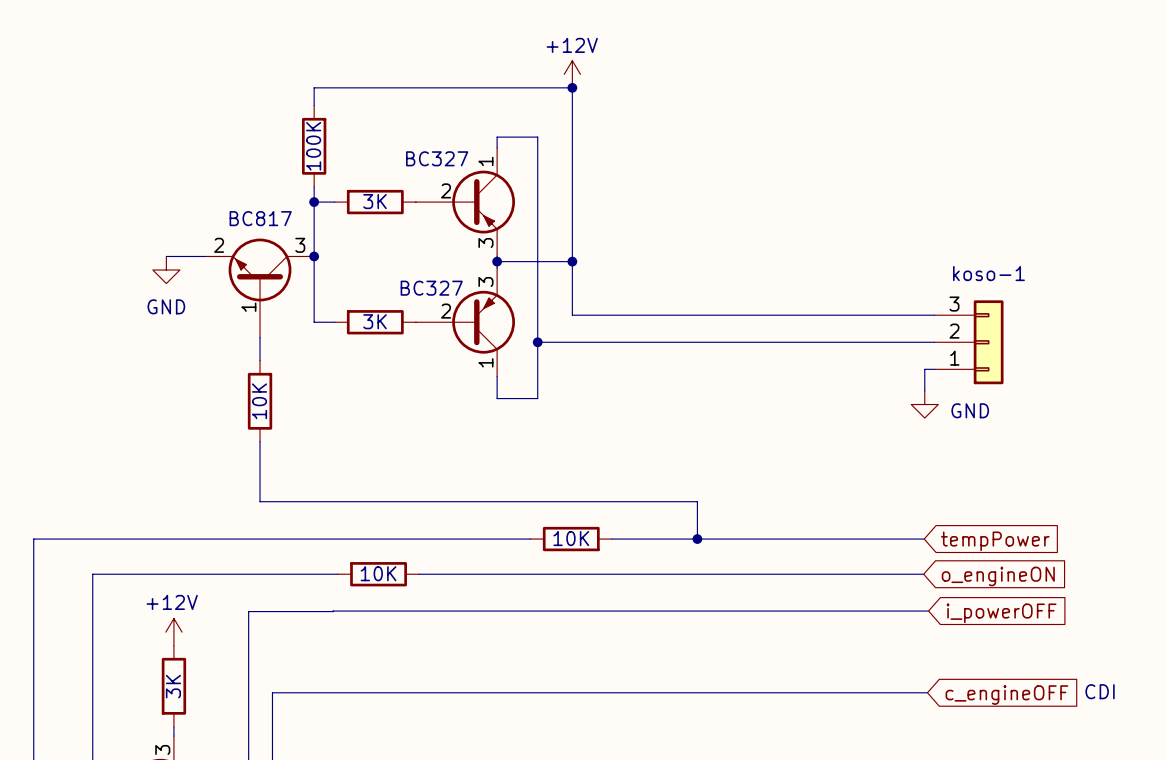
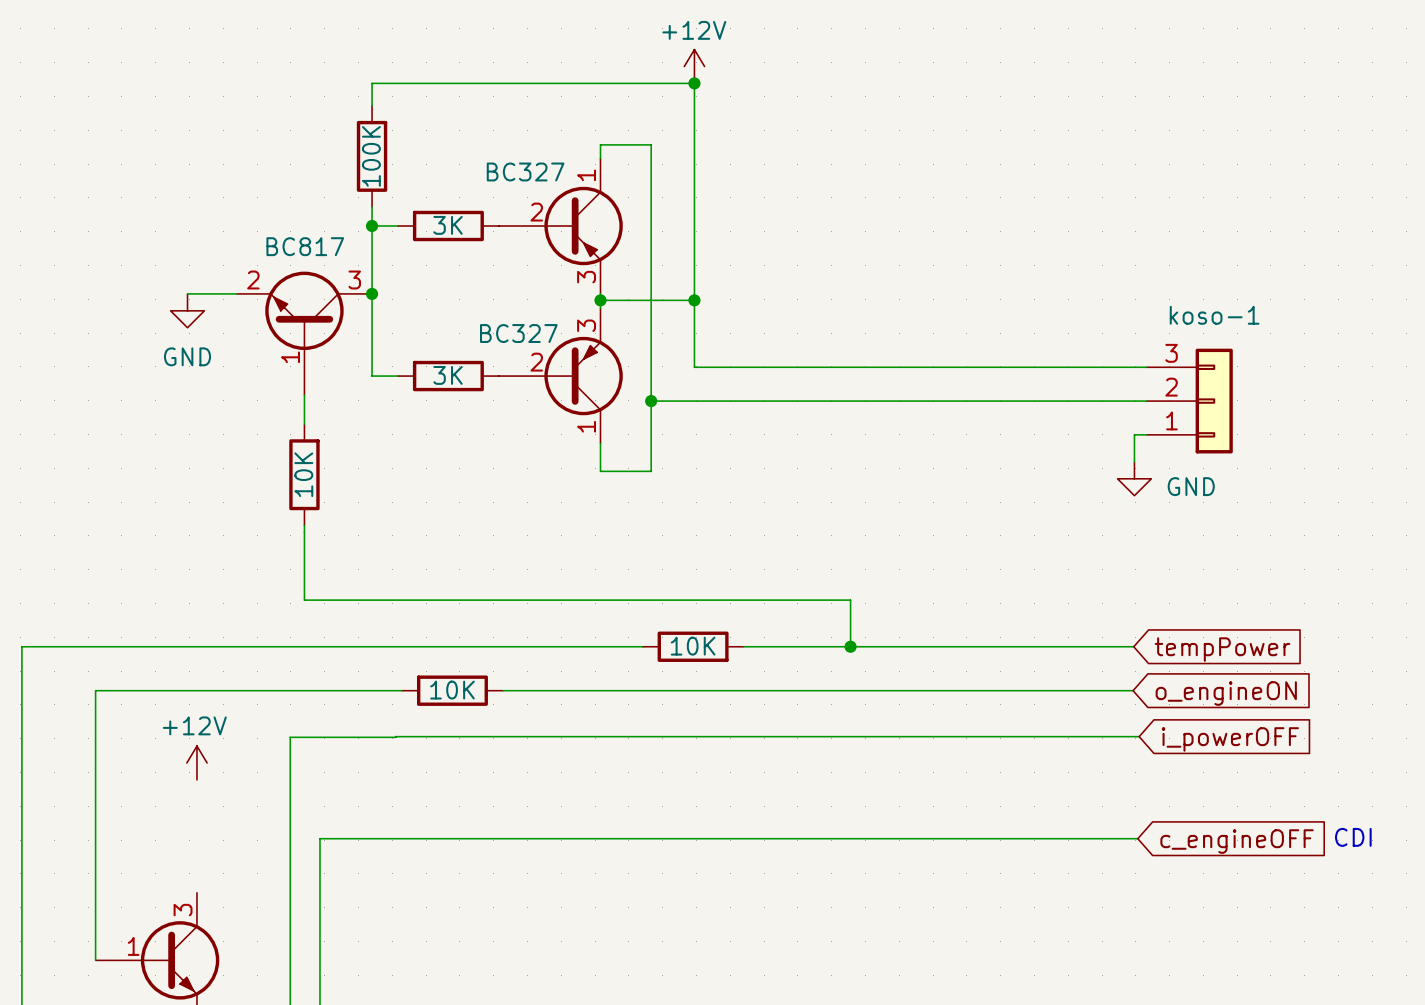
part: 3K (173, 686) -> none
wire: (173, 726) (173, 736) -> none

